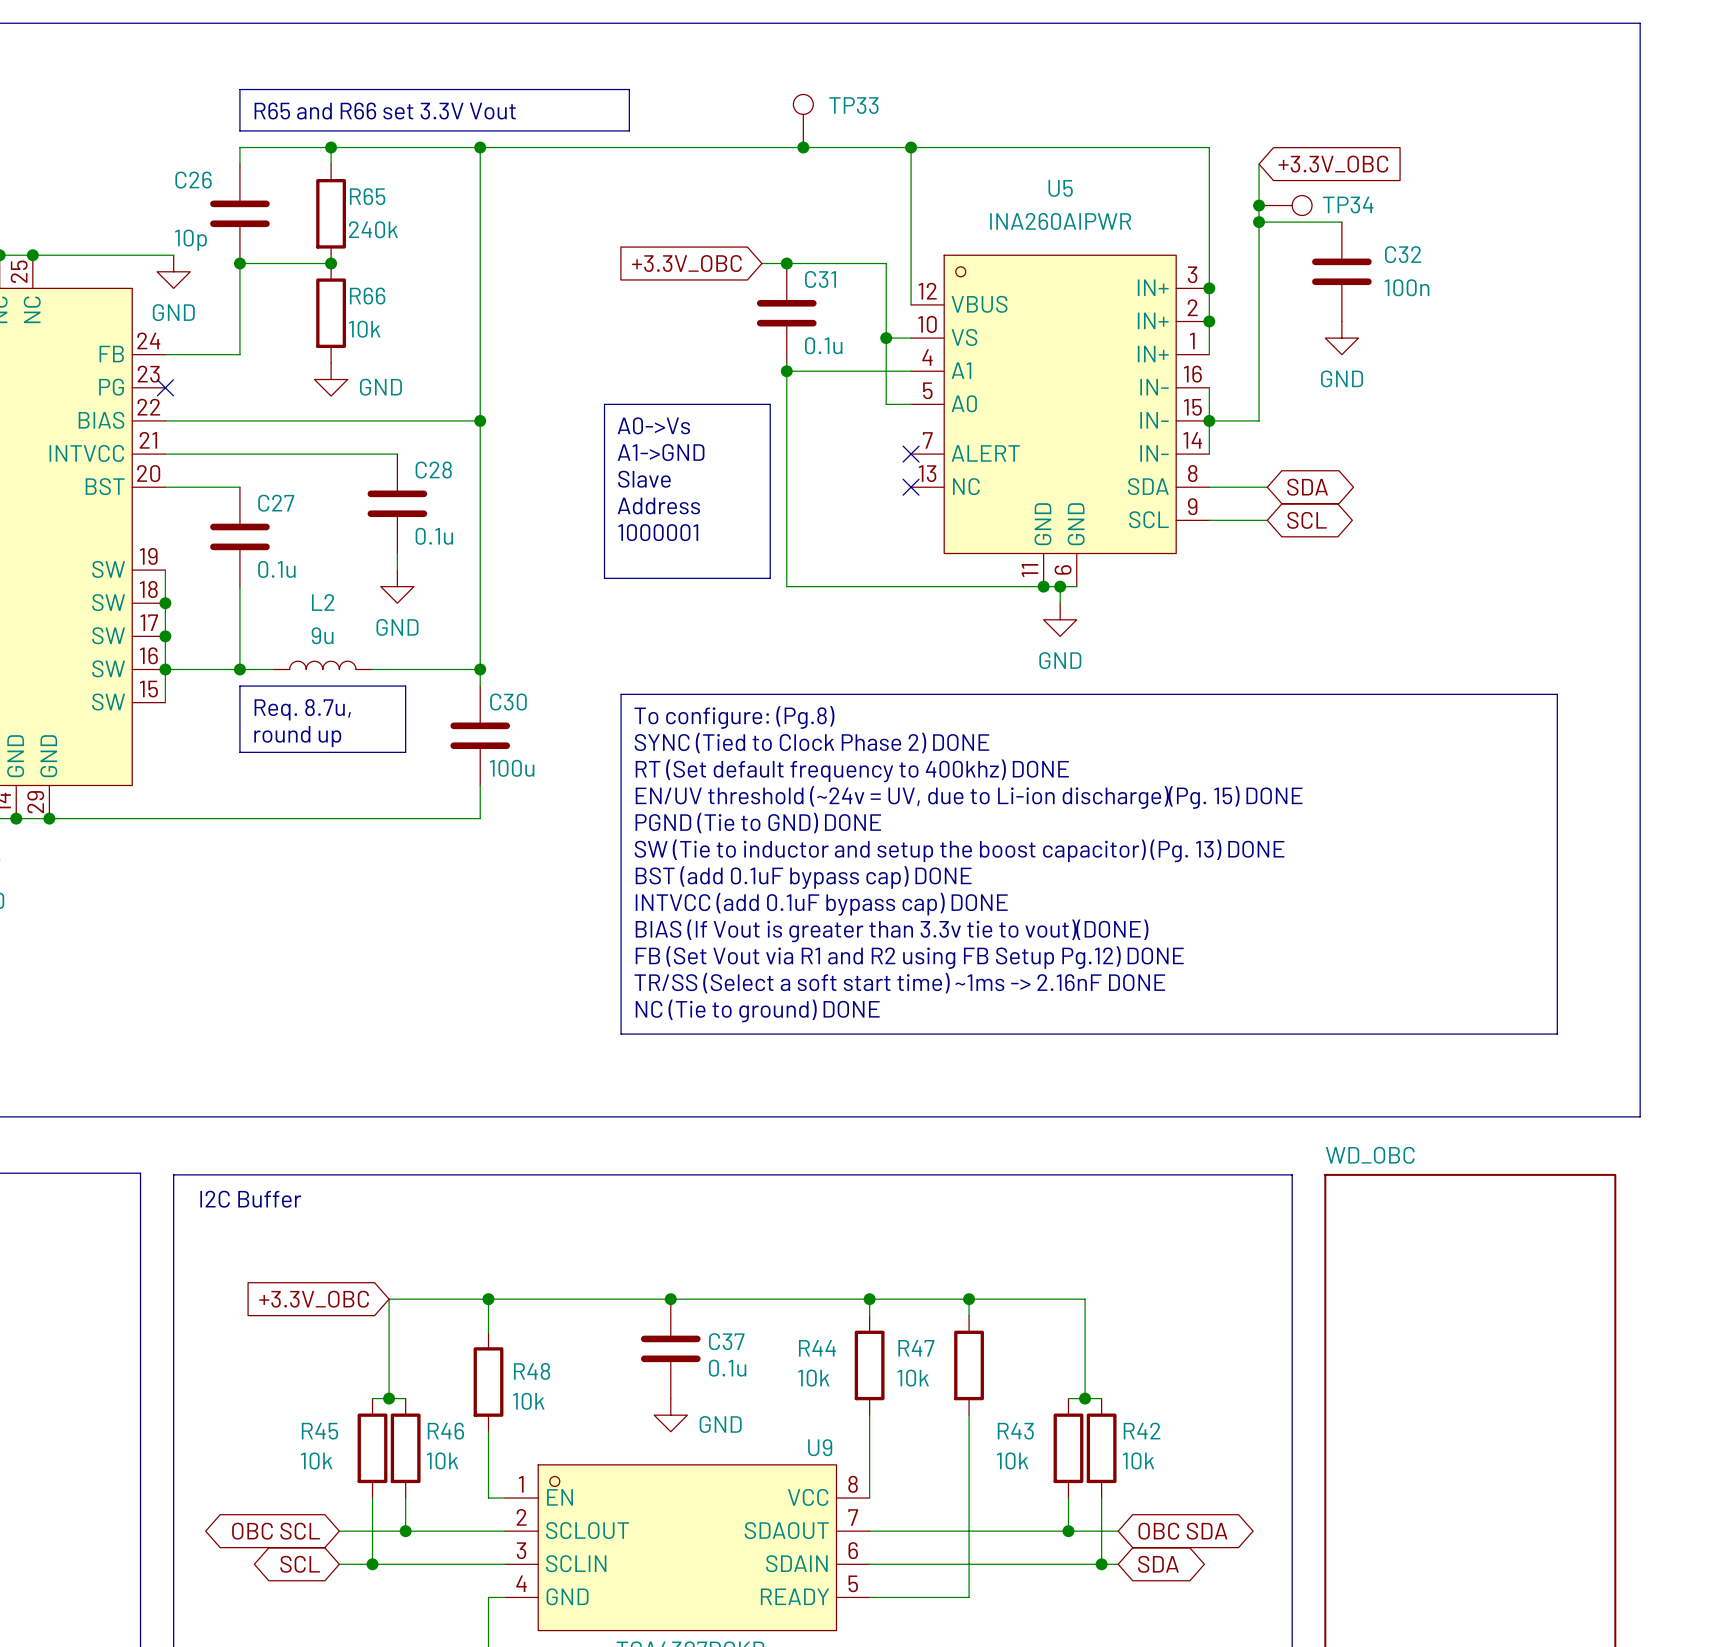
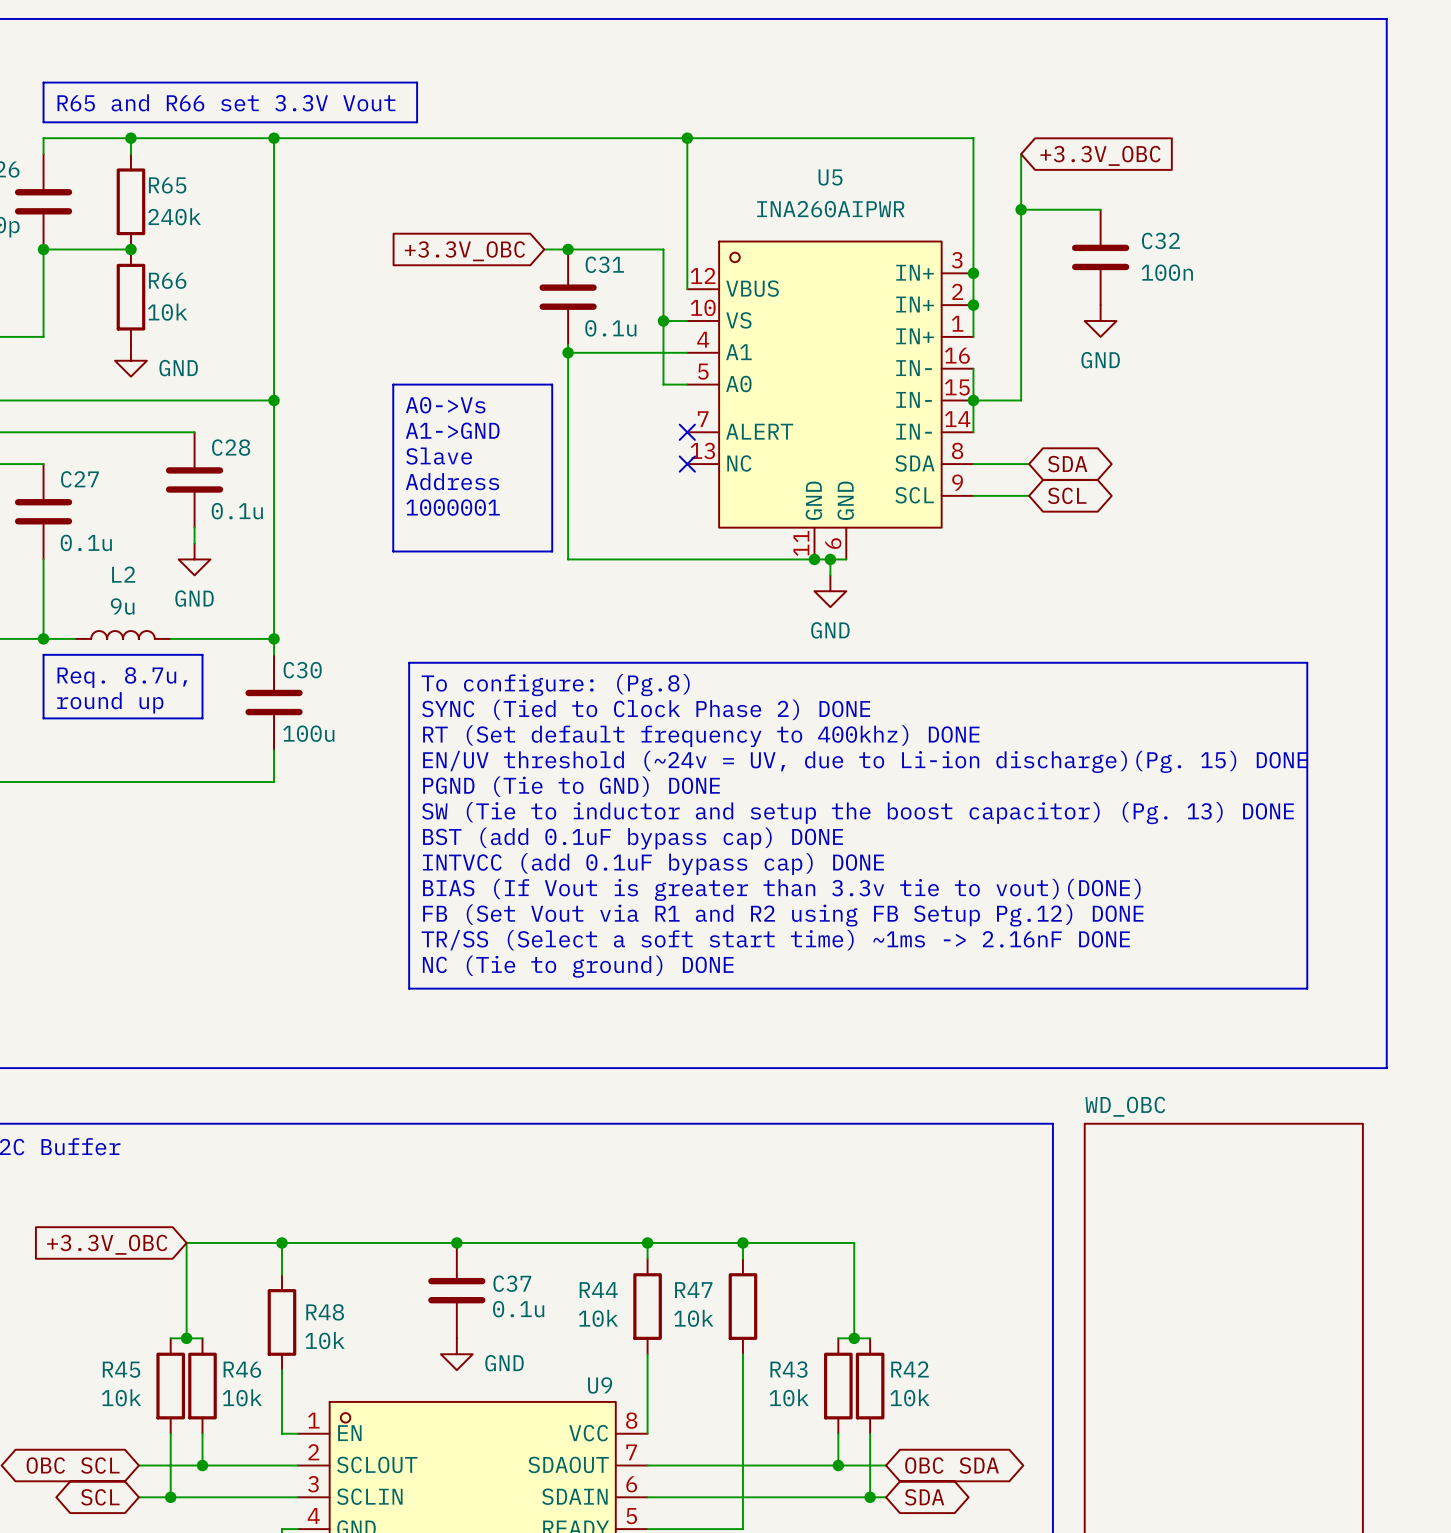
TP33: (803, 121) -> none
junction: (803, 147) -> none
junction: (1259, 205) -> none
TP34: (1285, 205) -> none

